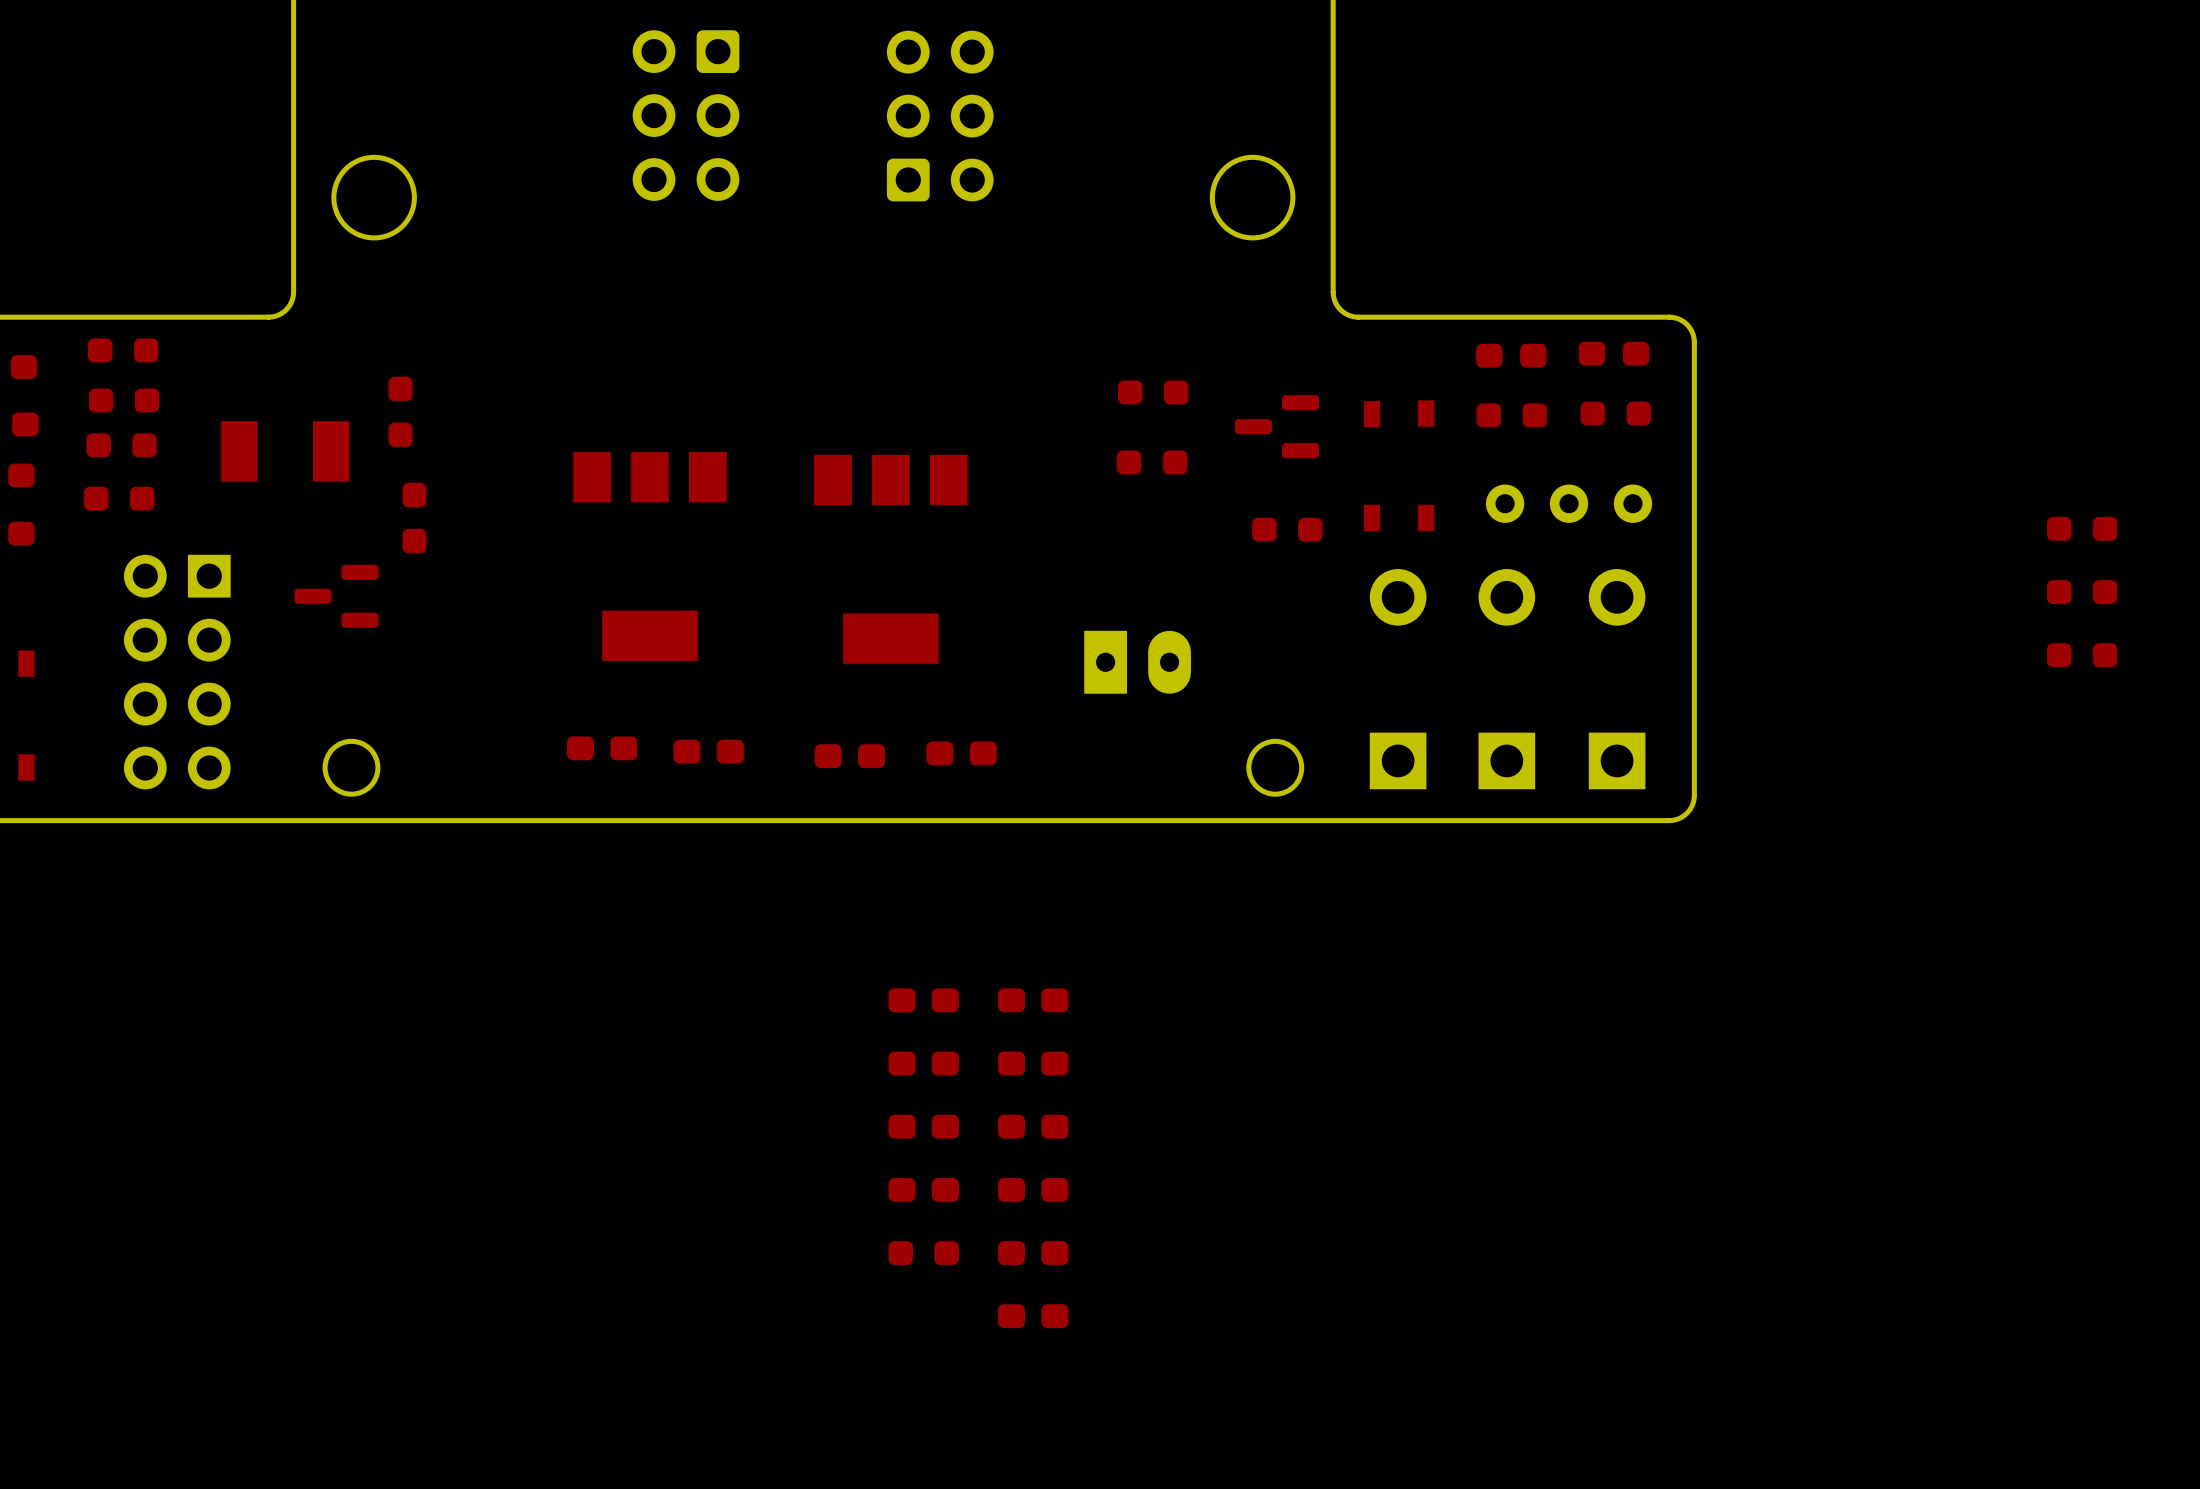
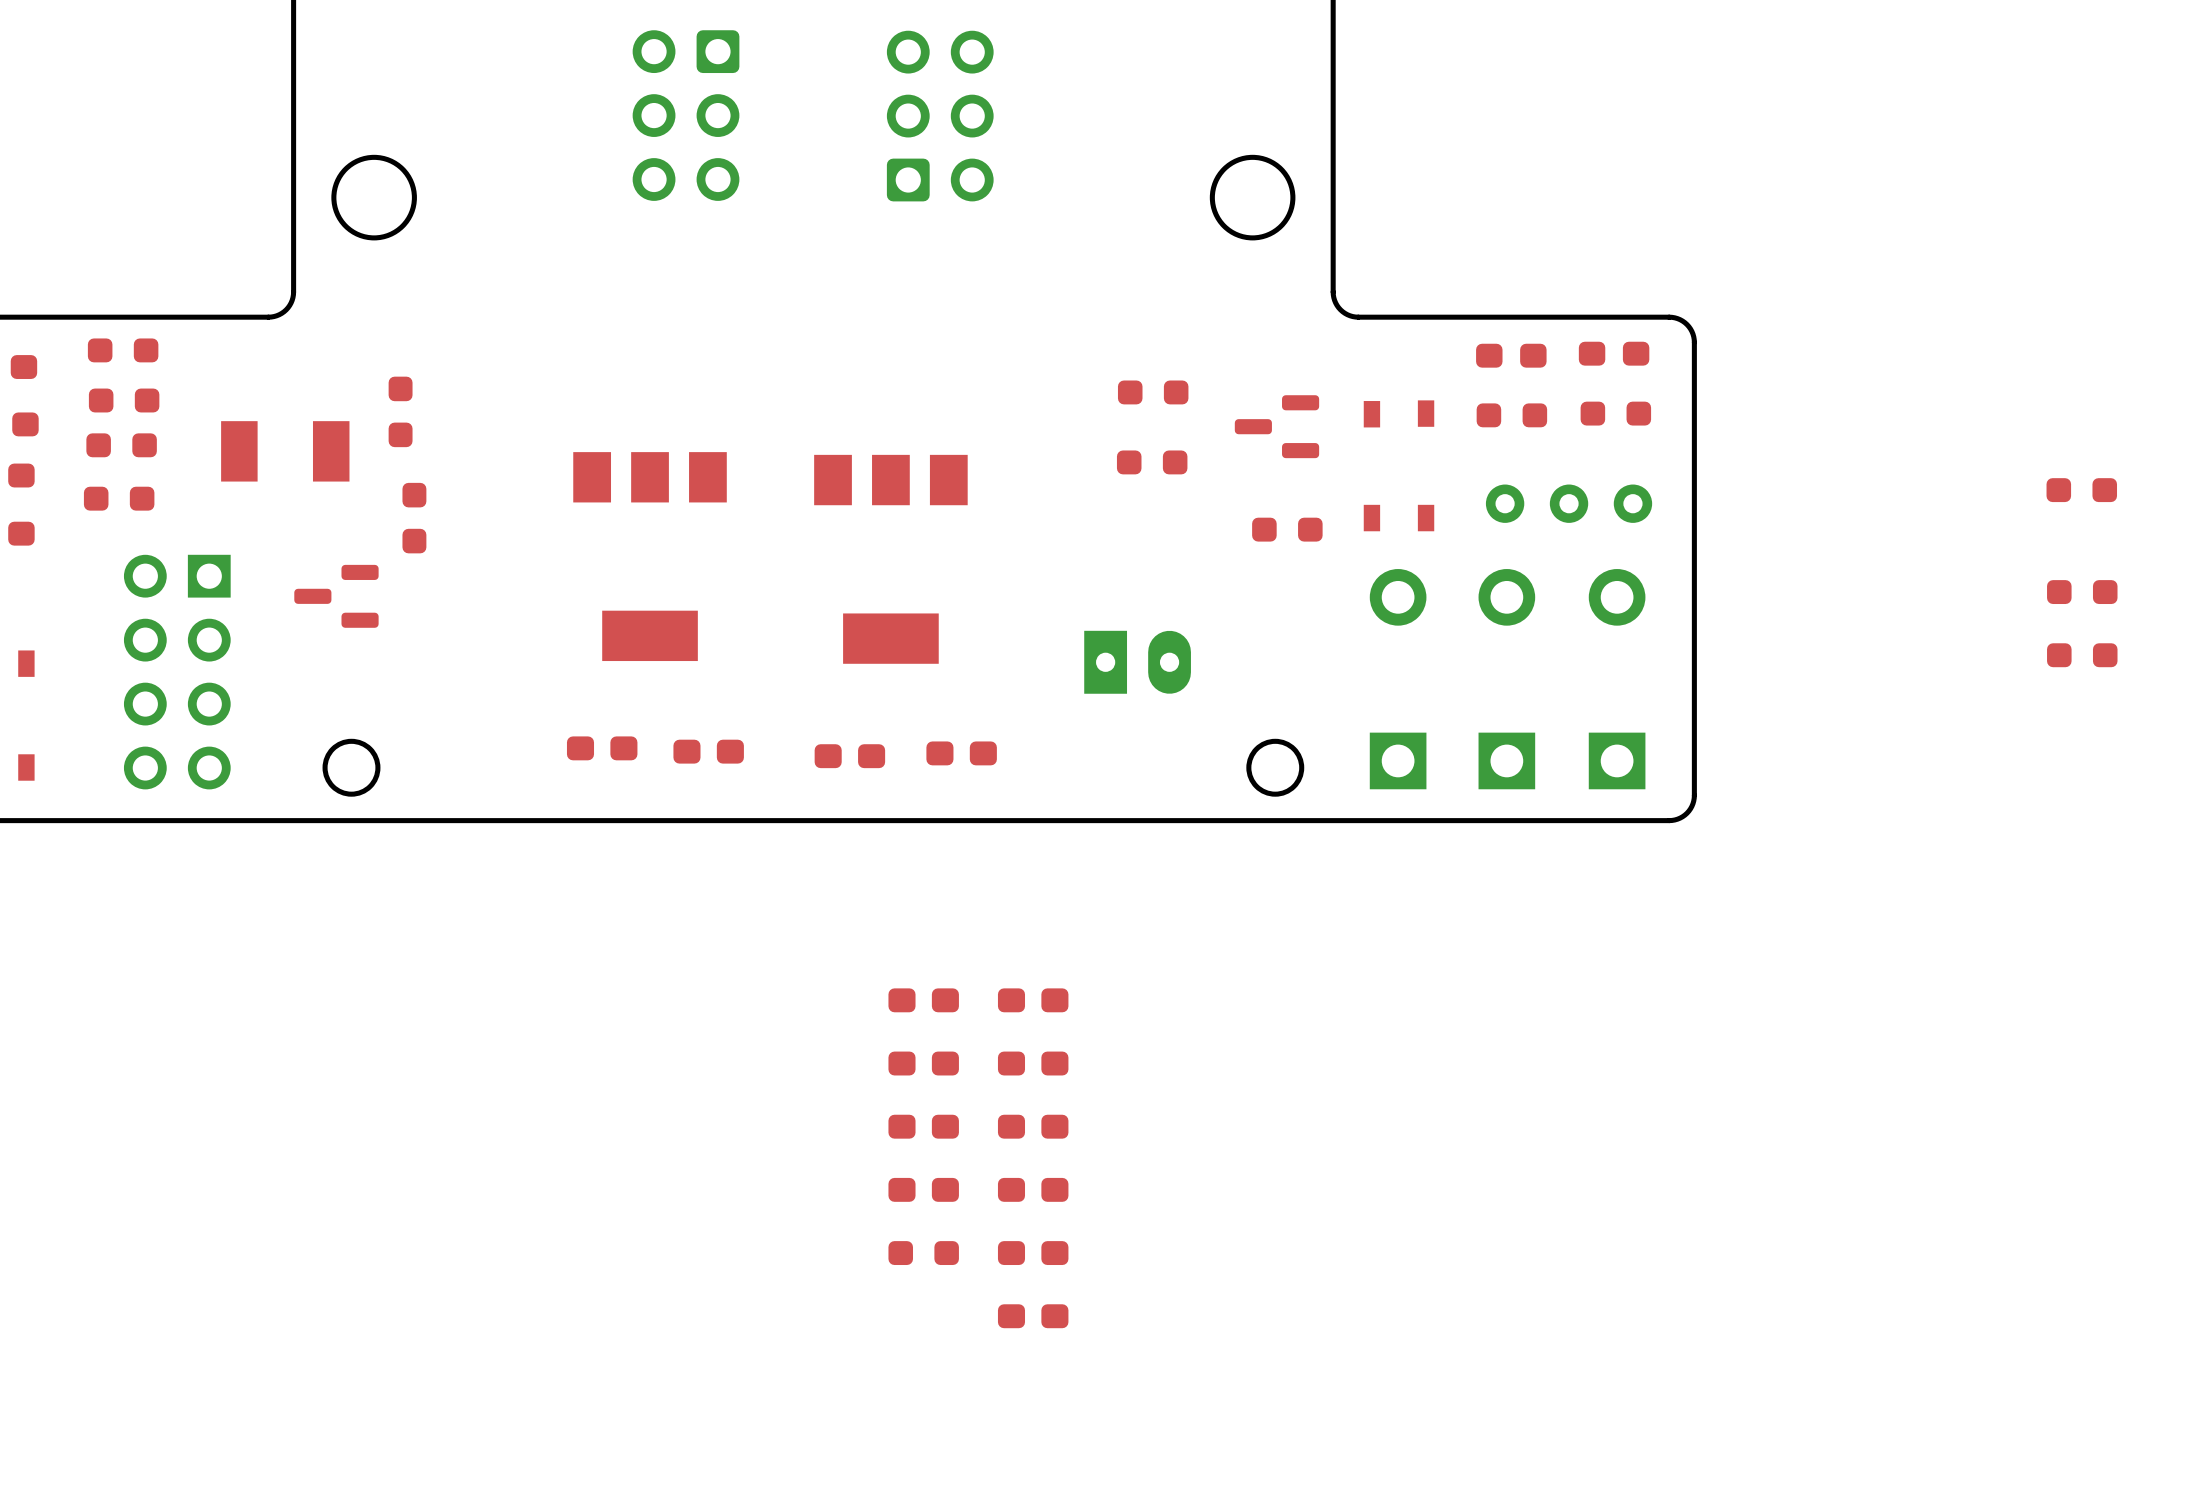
part position: (2082, 528) -> (2081, 490)

